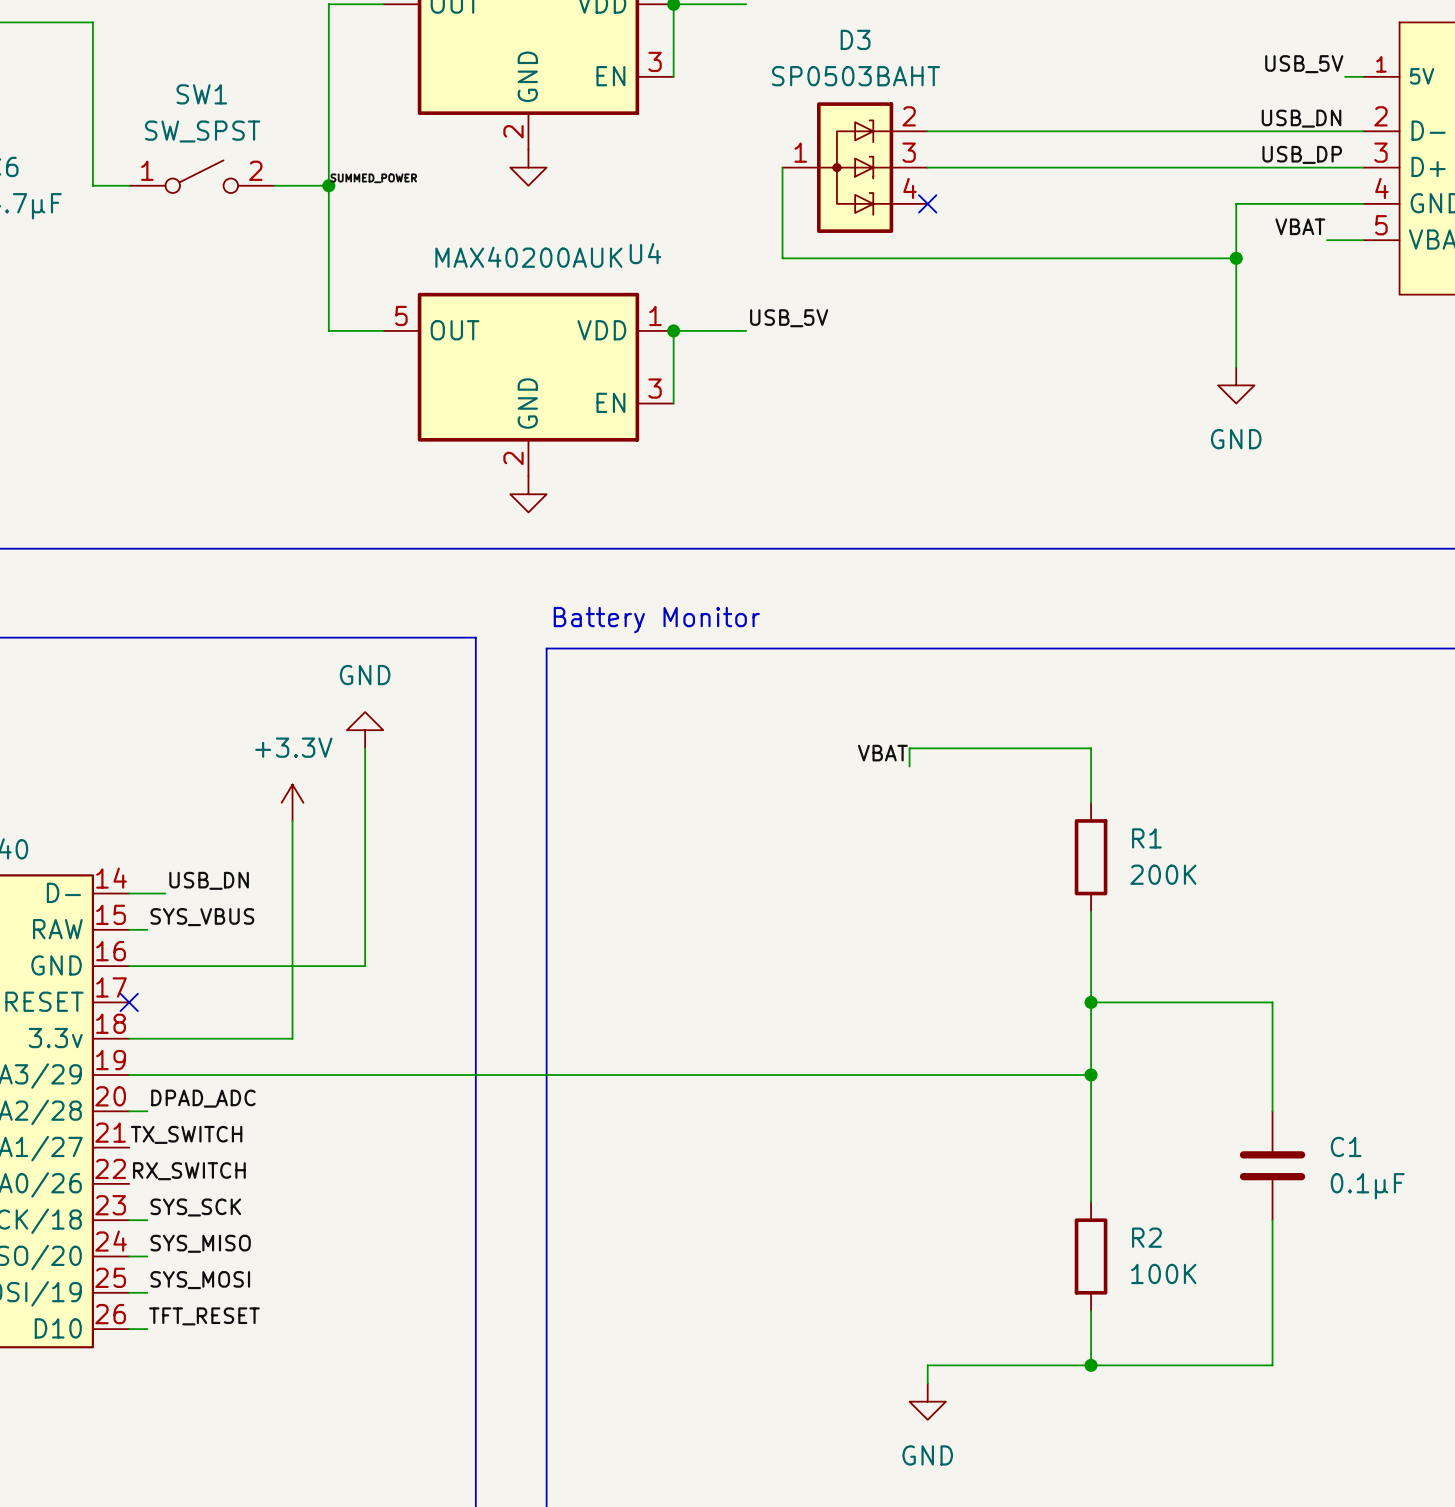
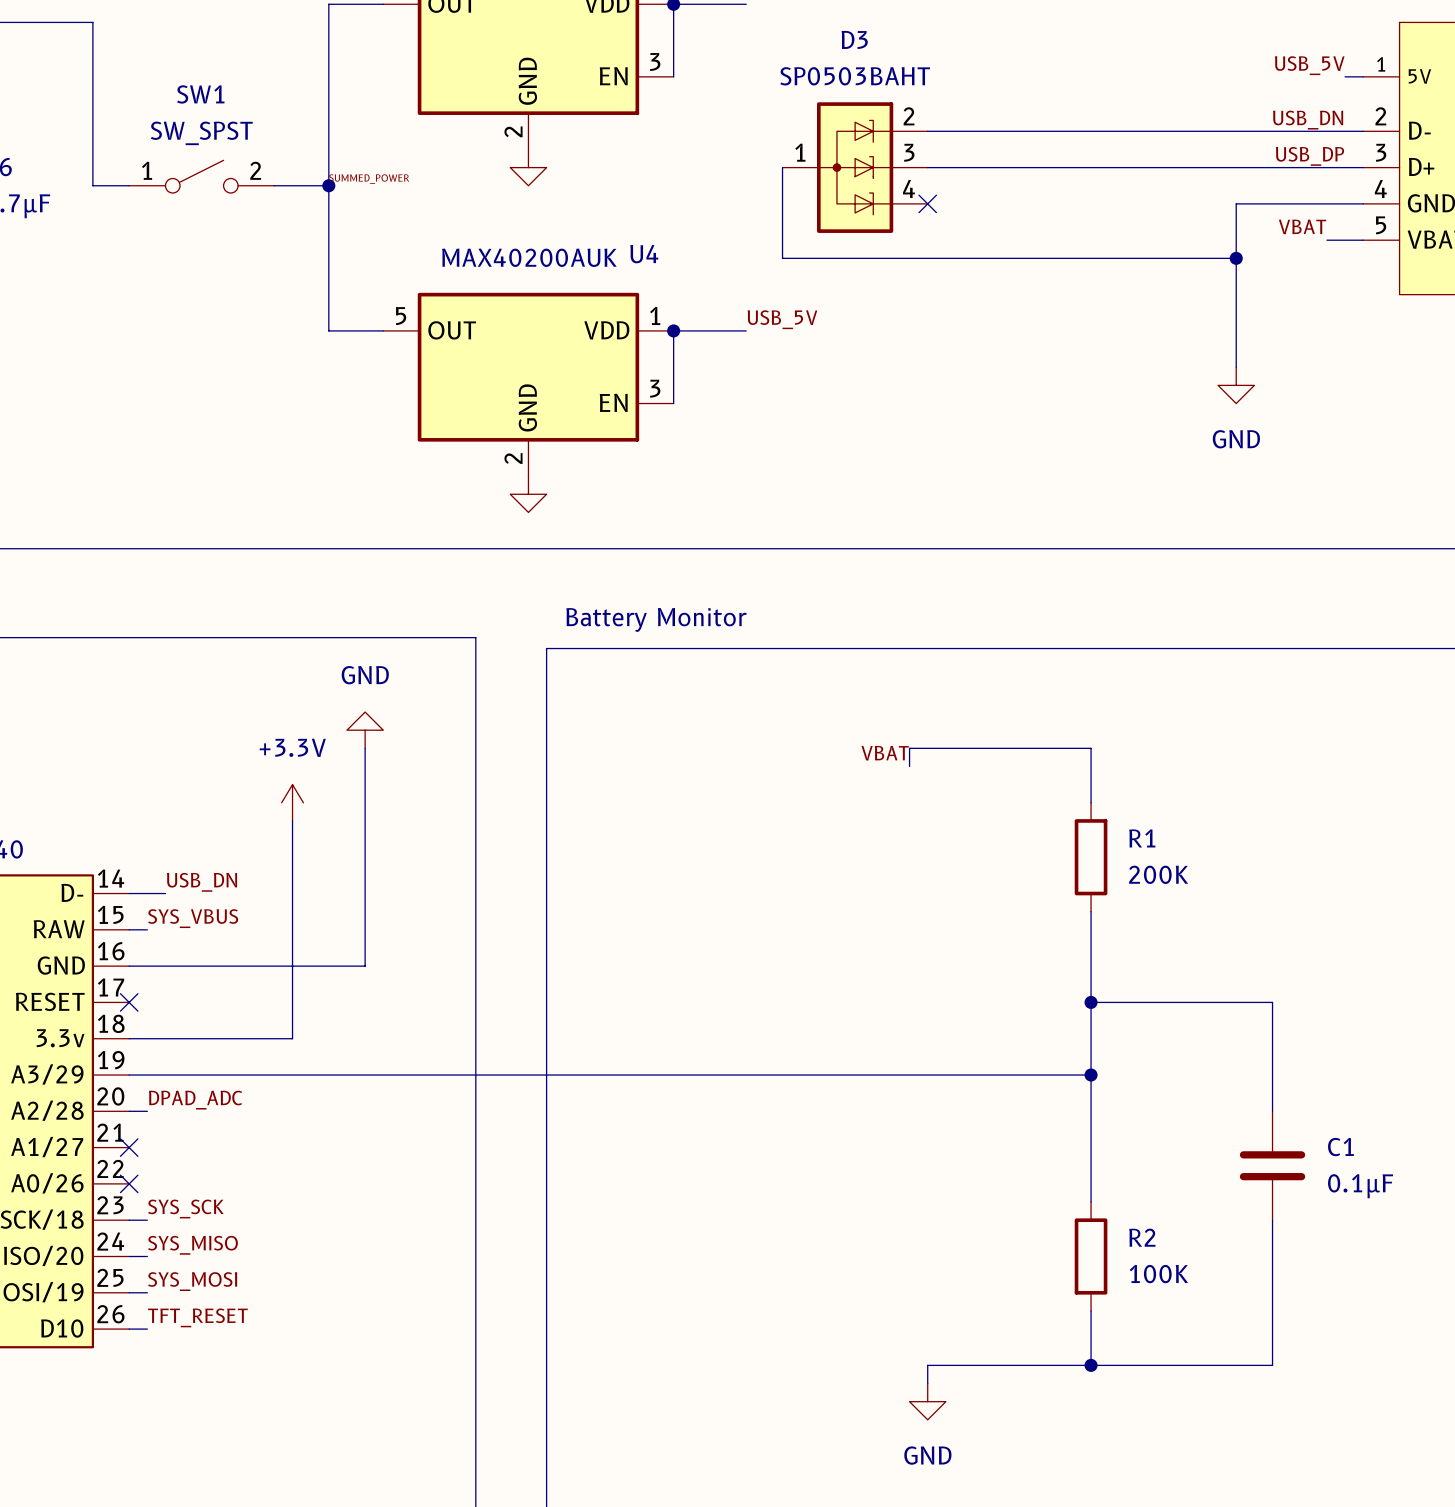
label: TX_SWITCH (186, 1134) -> none
no-connect mark: none -> (129, 1147)
label: RX_SWITCH (189, 1171) -> none
no-connect mark: none -> (129, 1183)

